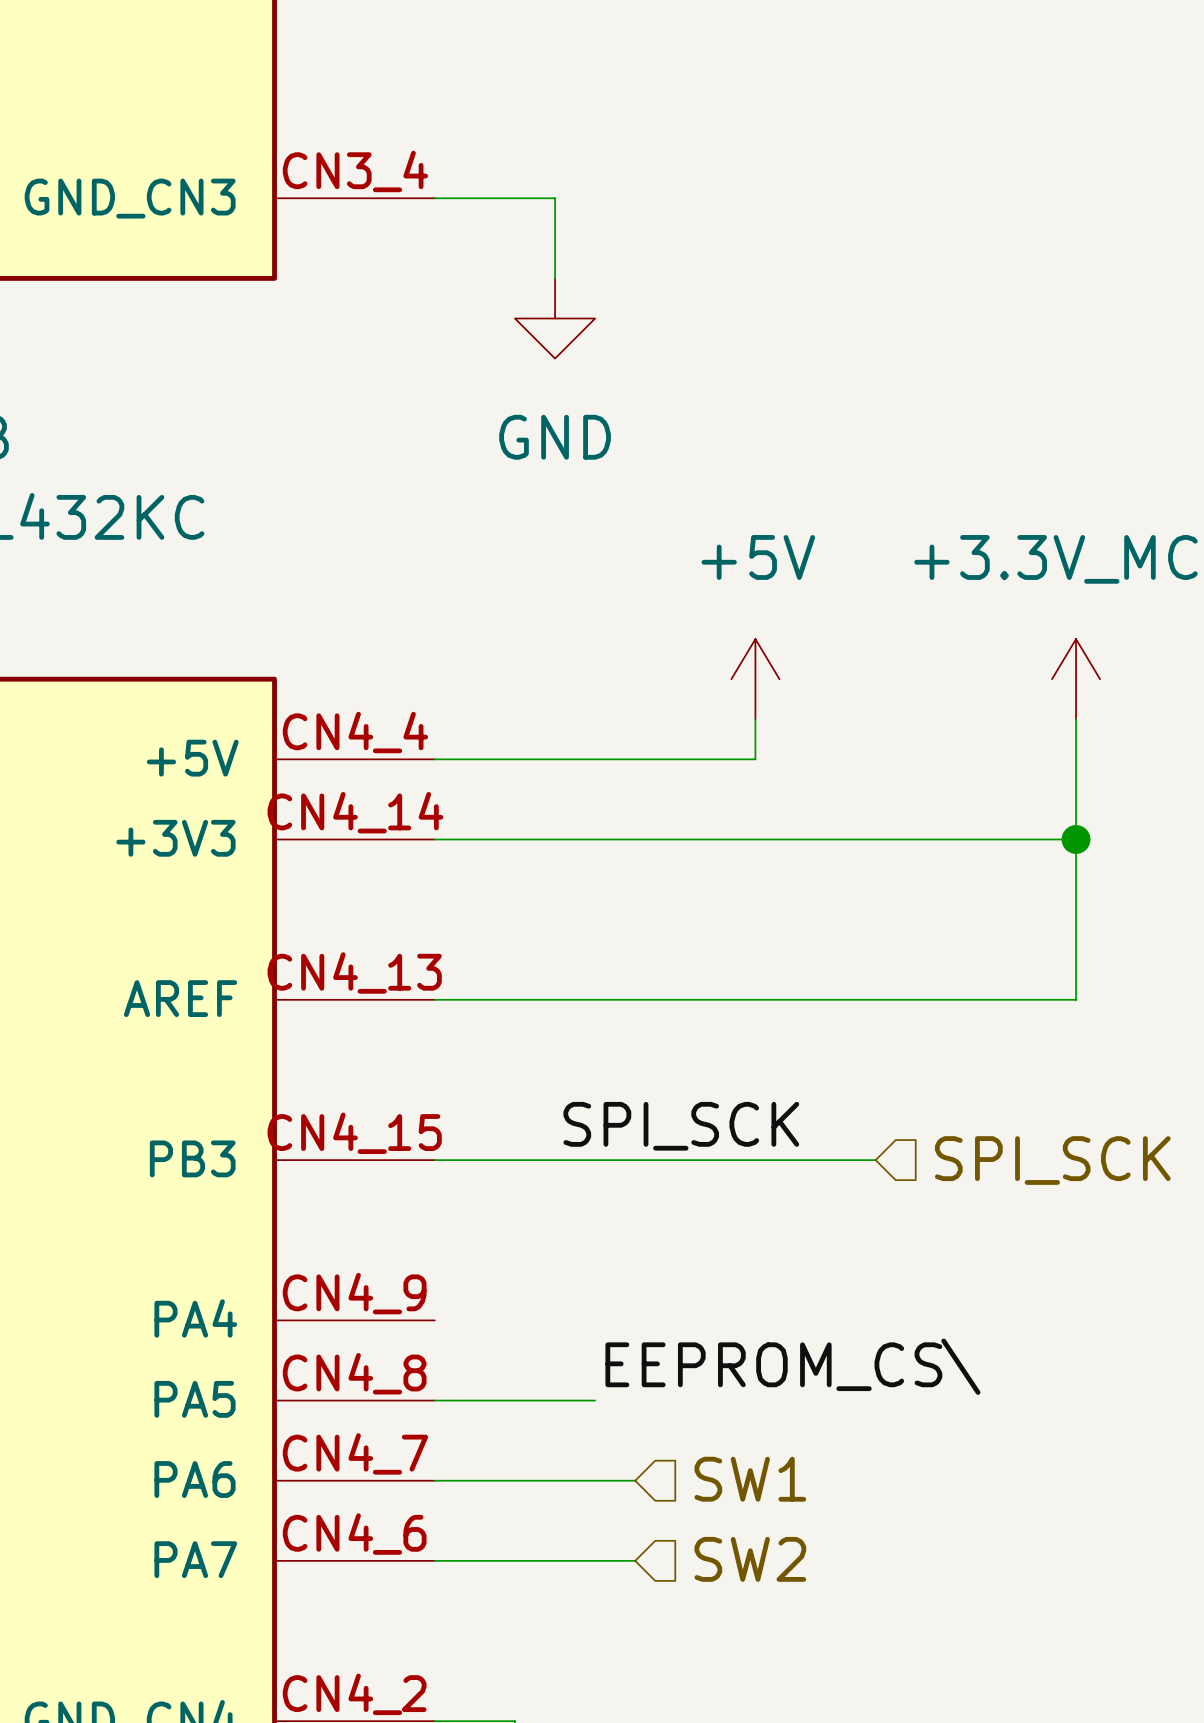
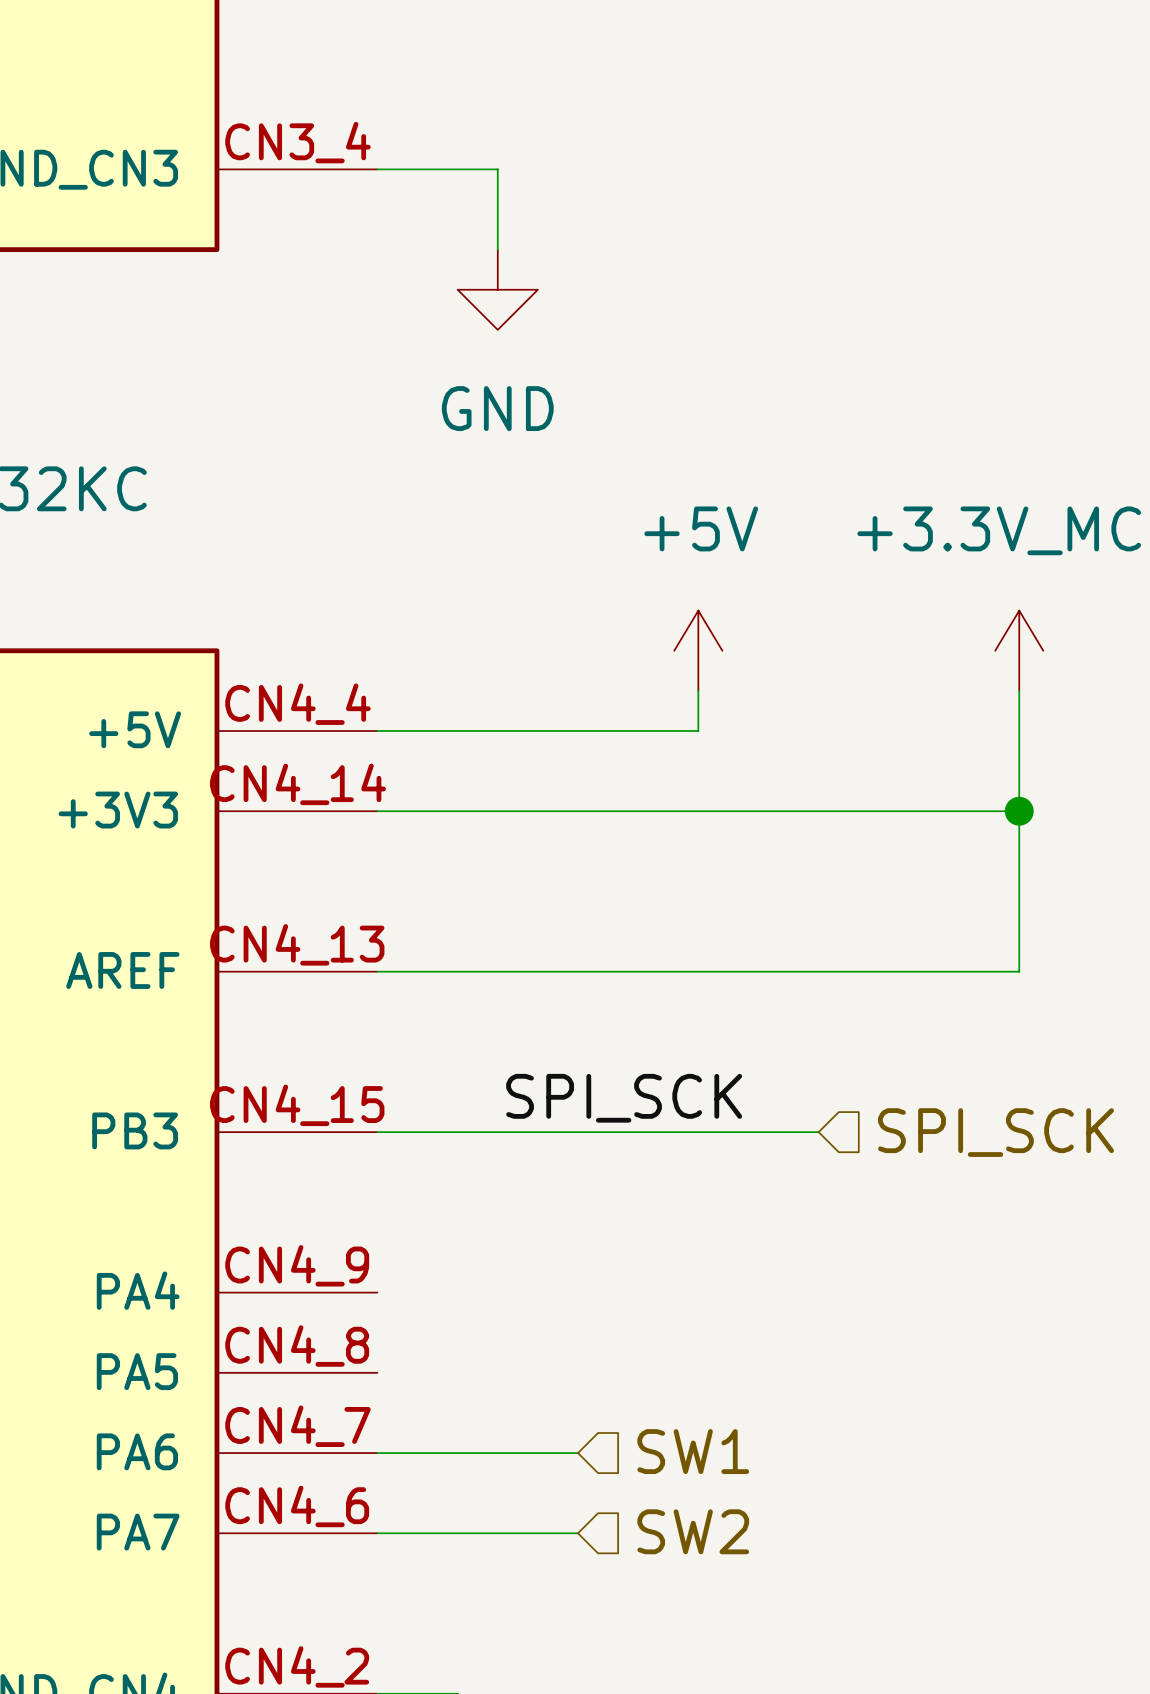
label: EEPROM_CS\ (792, 1366) -> none
wire: (434, 1400) (595, 1400) -> none

